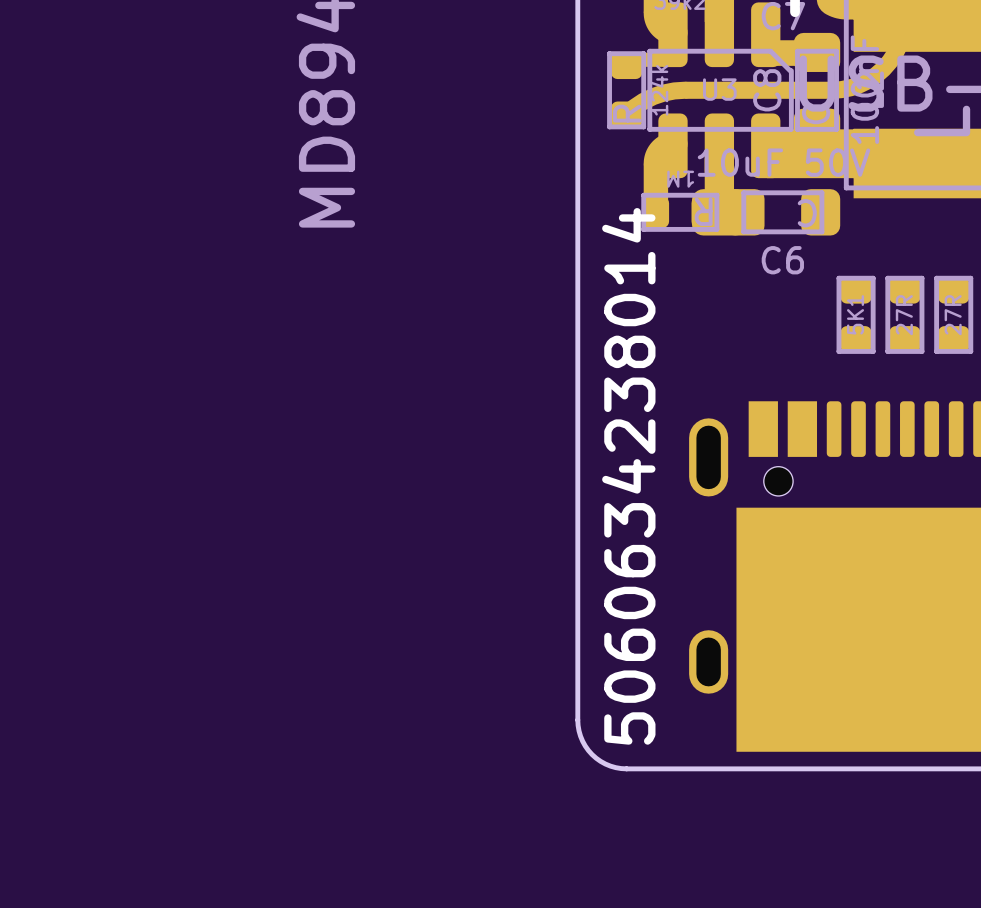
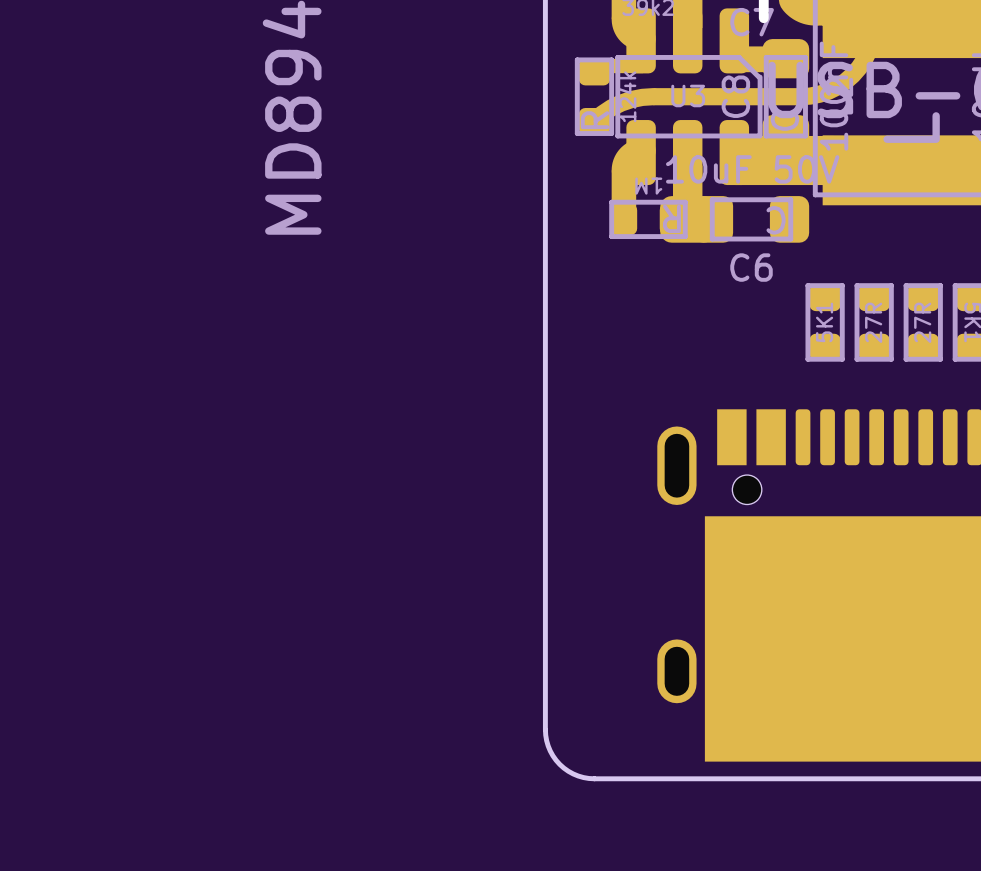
text: 5060634238014 (628, 476) -> none

